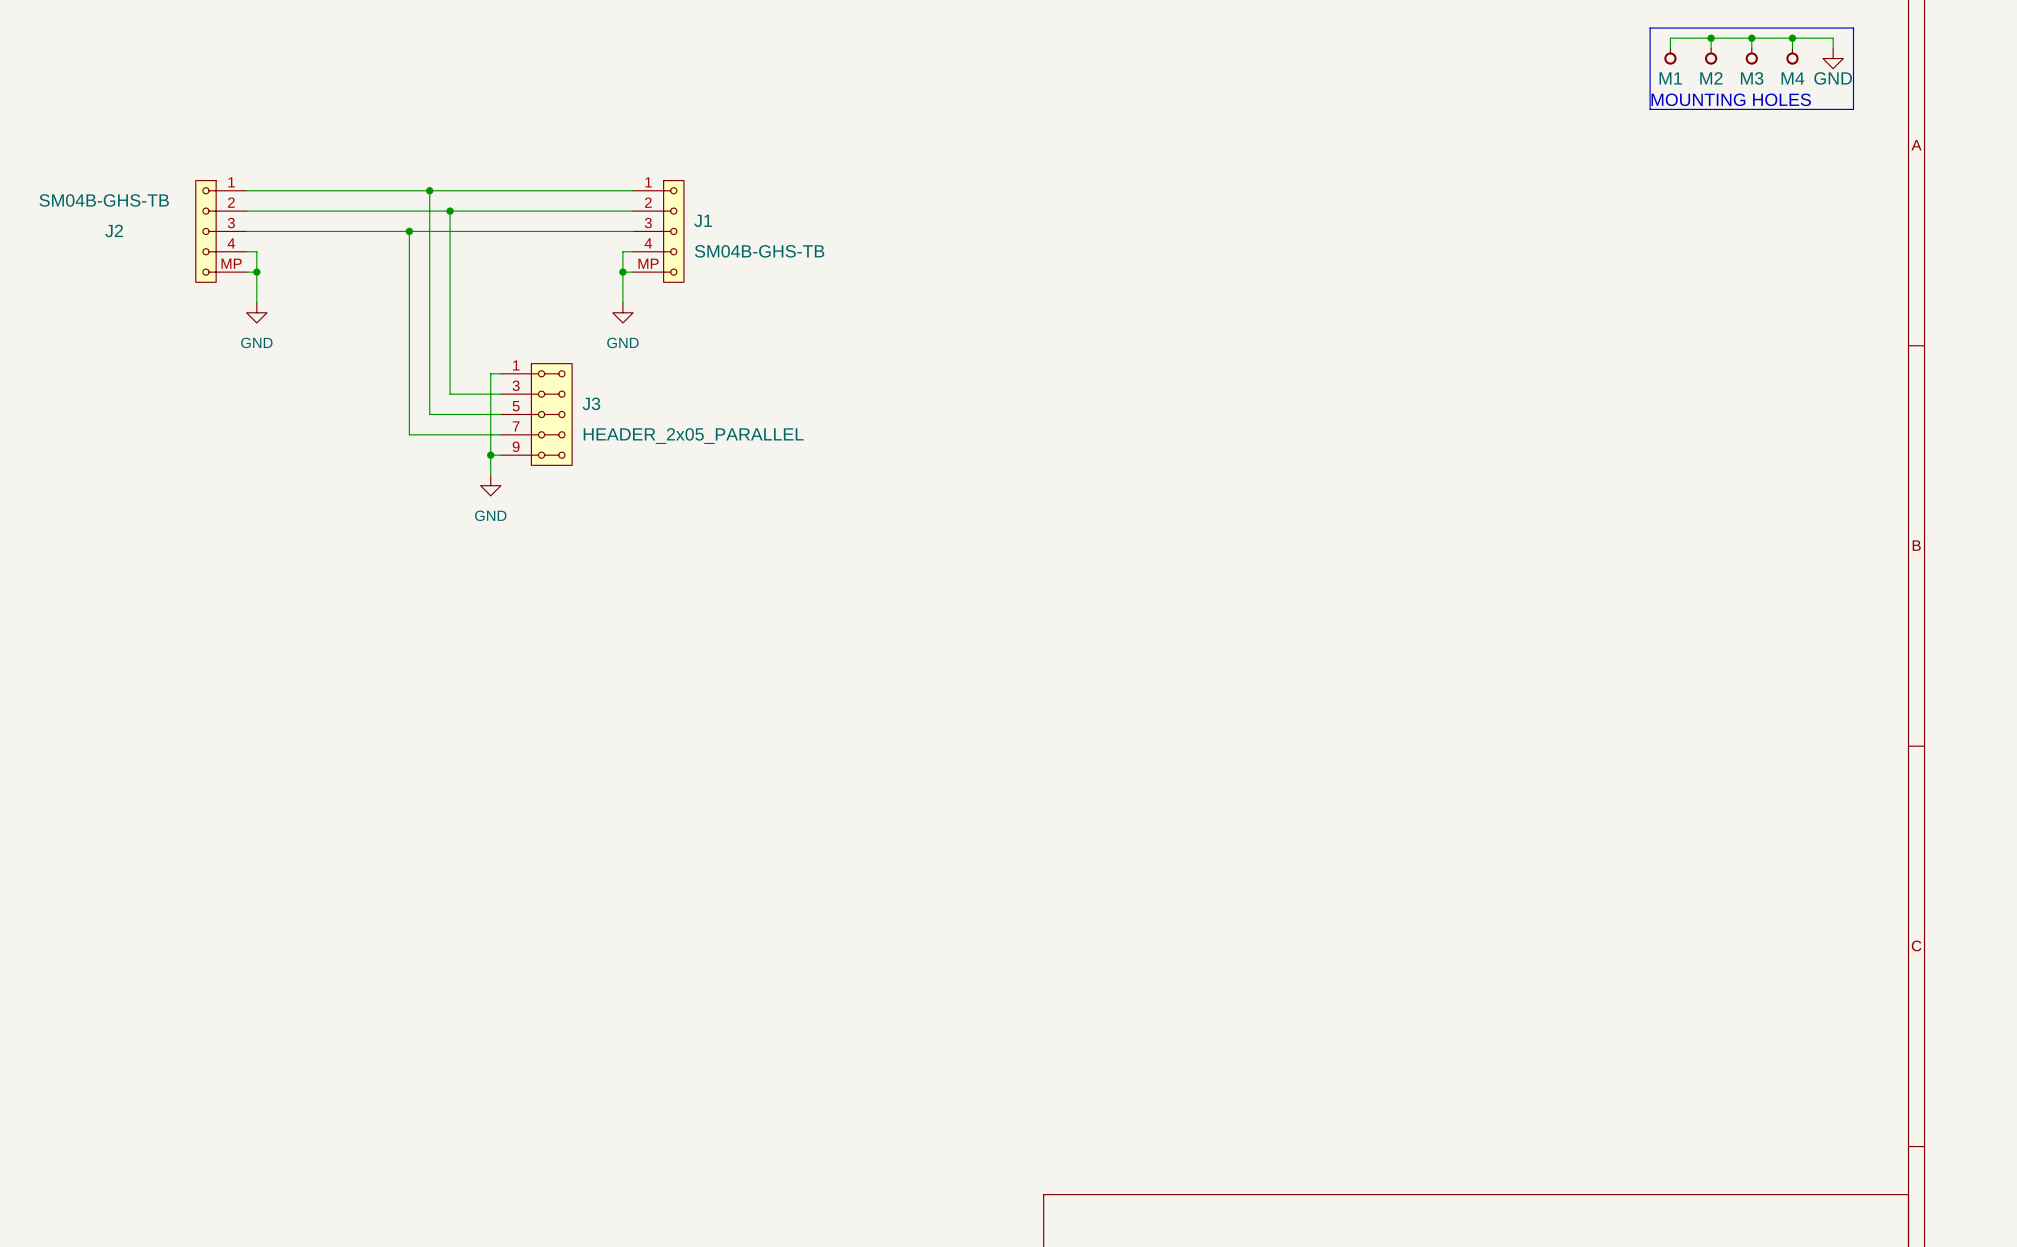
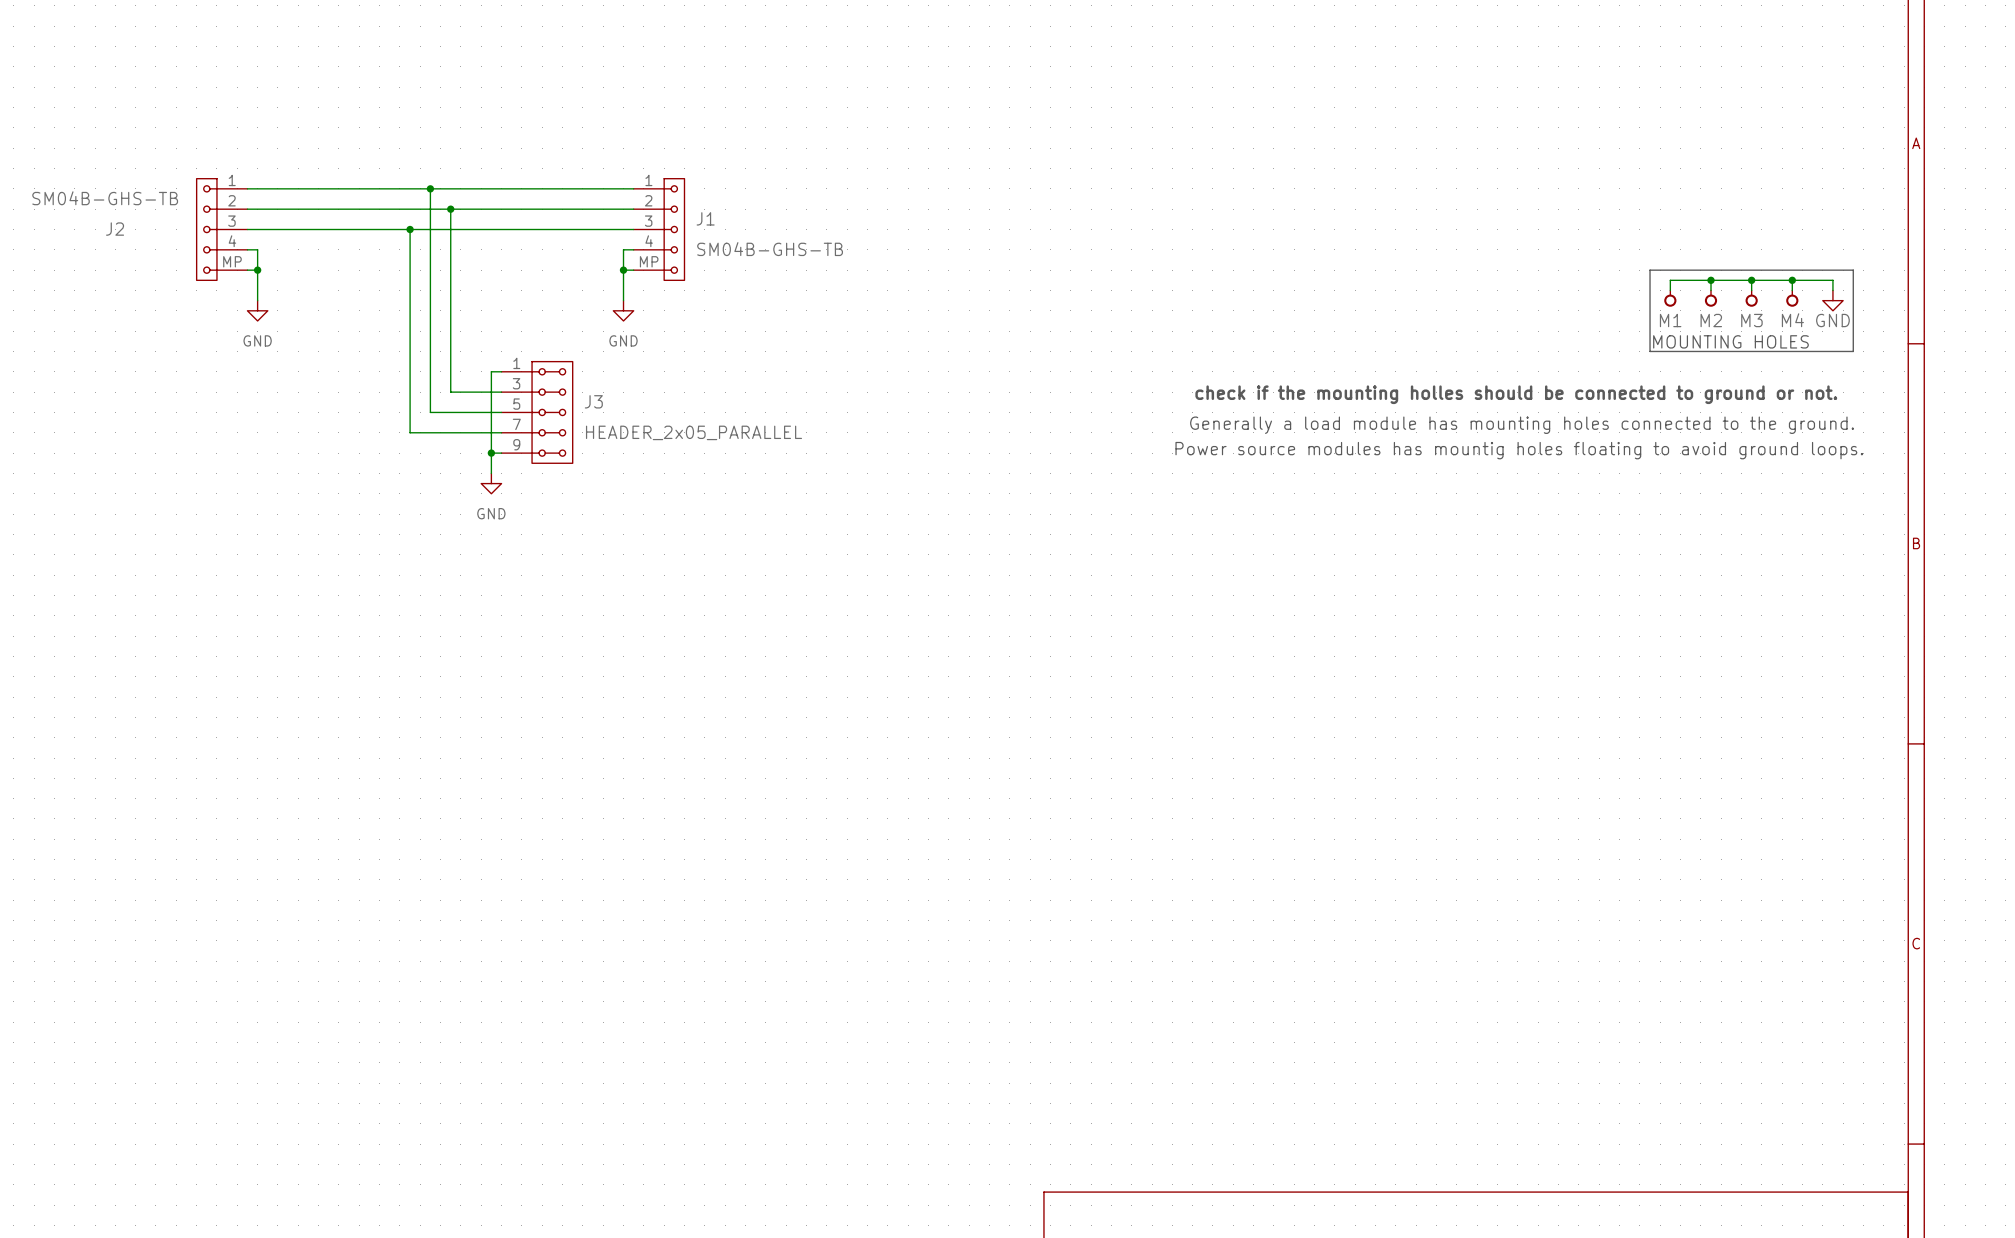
line: (1650, 28) (1650, 109) (1853, 109) (1853, 28) (1650, 28) -> none
wire: (1711, 38) (1711, 48) -> none
junction: (1711, 38) -> none
wire: (1751, 38) (1751, 48) -> none
junction: (1751, 38) -> none
wire: (1792, 38) (1792, 48) -> none
junction: (1792, 38) -> none
wire: (1670, 48) (1670, 38) (1833, 38) (1833, 48) -> none
M1 position: (1670, 56) -> (1670, 298)
M2 position: (1711, 56) -> (1710, 298)
M3 position: (1751, 56) -> (1751, 298)
M4 position: (1792, 56) -> (1792, 298)
power symbol: GND (1833, 58) -> none
text: MOUNTING HOLES (1731, 99) -> none
line: none -> (1650, 270) (1650, 351) (1853, 351) (1853, 270) (1650, 270)
wire: none -> (1710, 280) (1710, 290)
junction: none -> (1710, 280)
wire: none -> (1751, 280) (1751, 290)
junction: none -> (1751, 280)
wire: none -> (1792, 280) (1792, 290)
junction: none -> (1792, 280)
wire: none -> (1670, 290) (1670, 280) (1832, 280) (1832, 290)
power symbol: none -> GND (1832, 300)
text: none -> MOUNTING HOLES (1730, 341)
text: none -> check if the mounting holles should be connected to ground or not. (1516, 394)
text: none -> Generally a load module has mounting holes connected to the ground. (1522, 425)
text: none -> Power source modules has mountig holes floating to avoid ground loops. (1519, 450)

